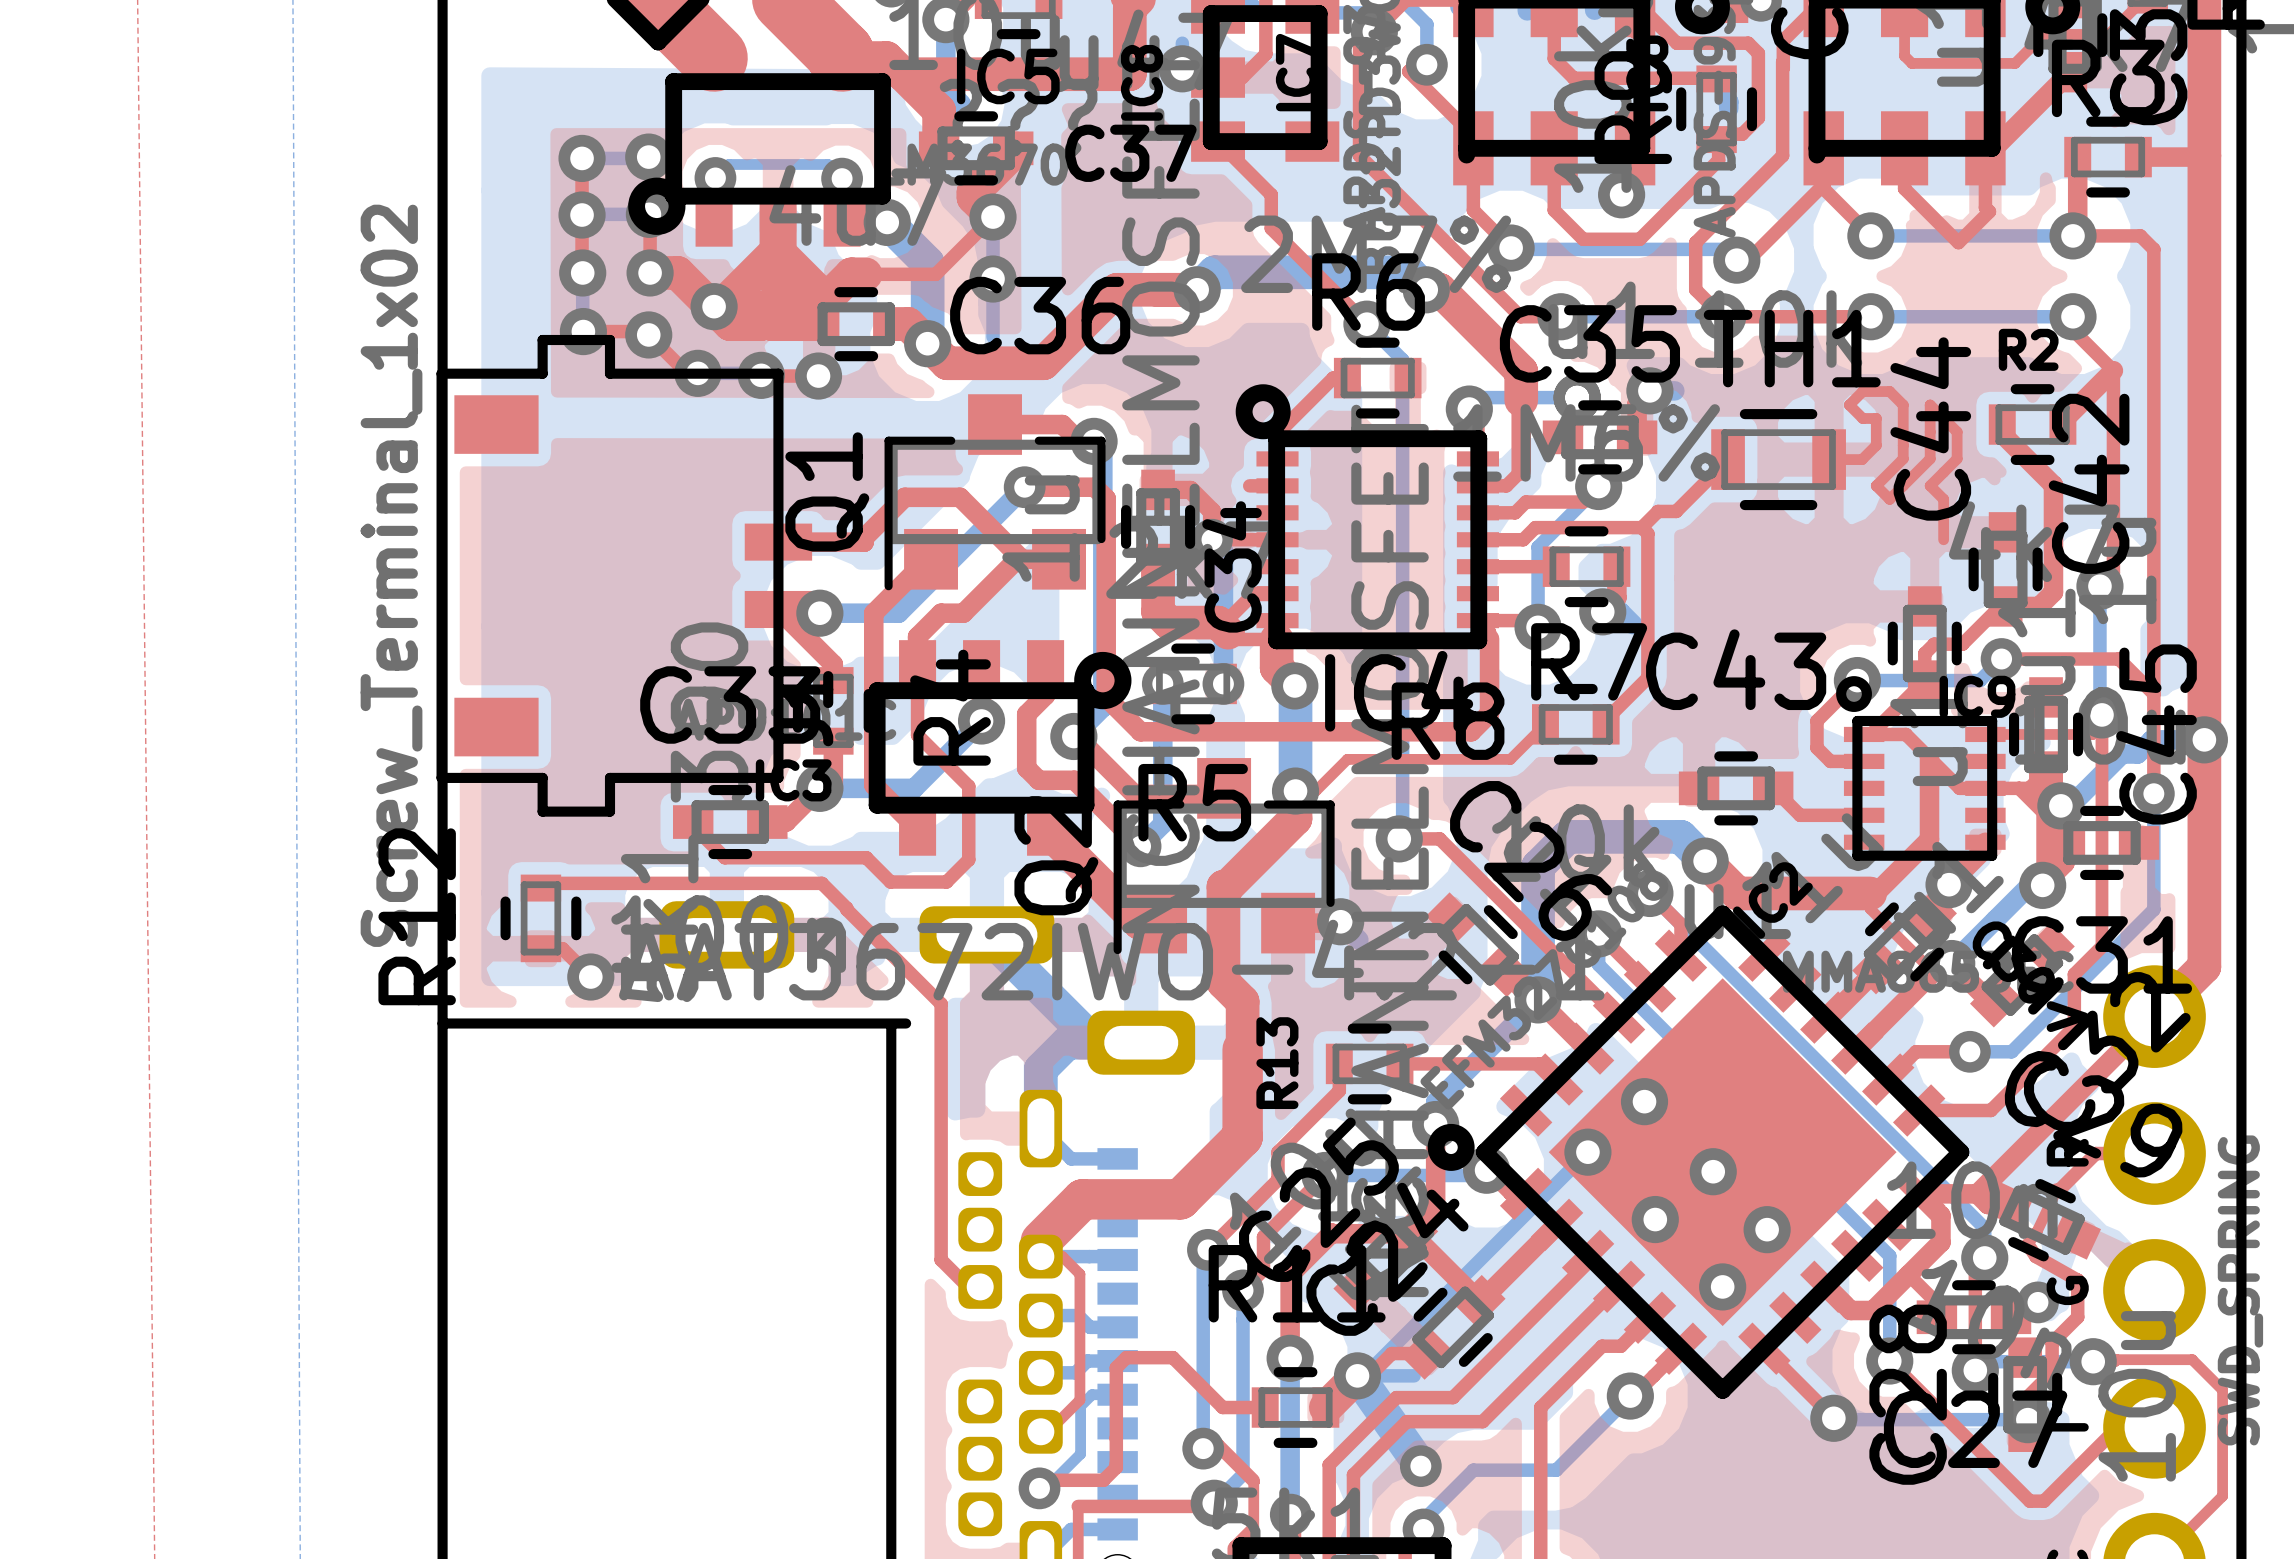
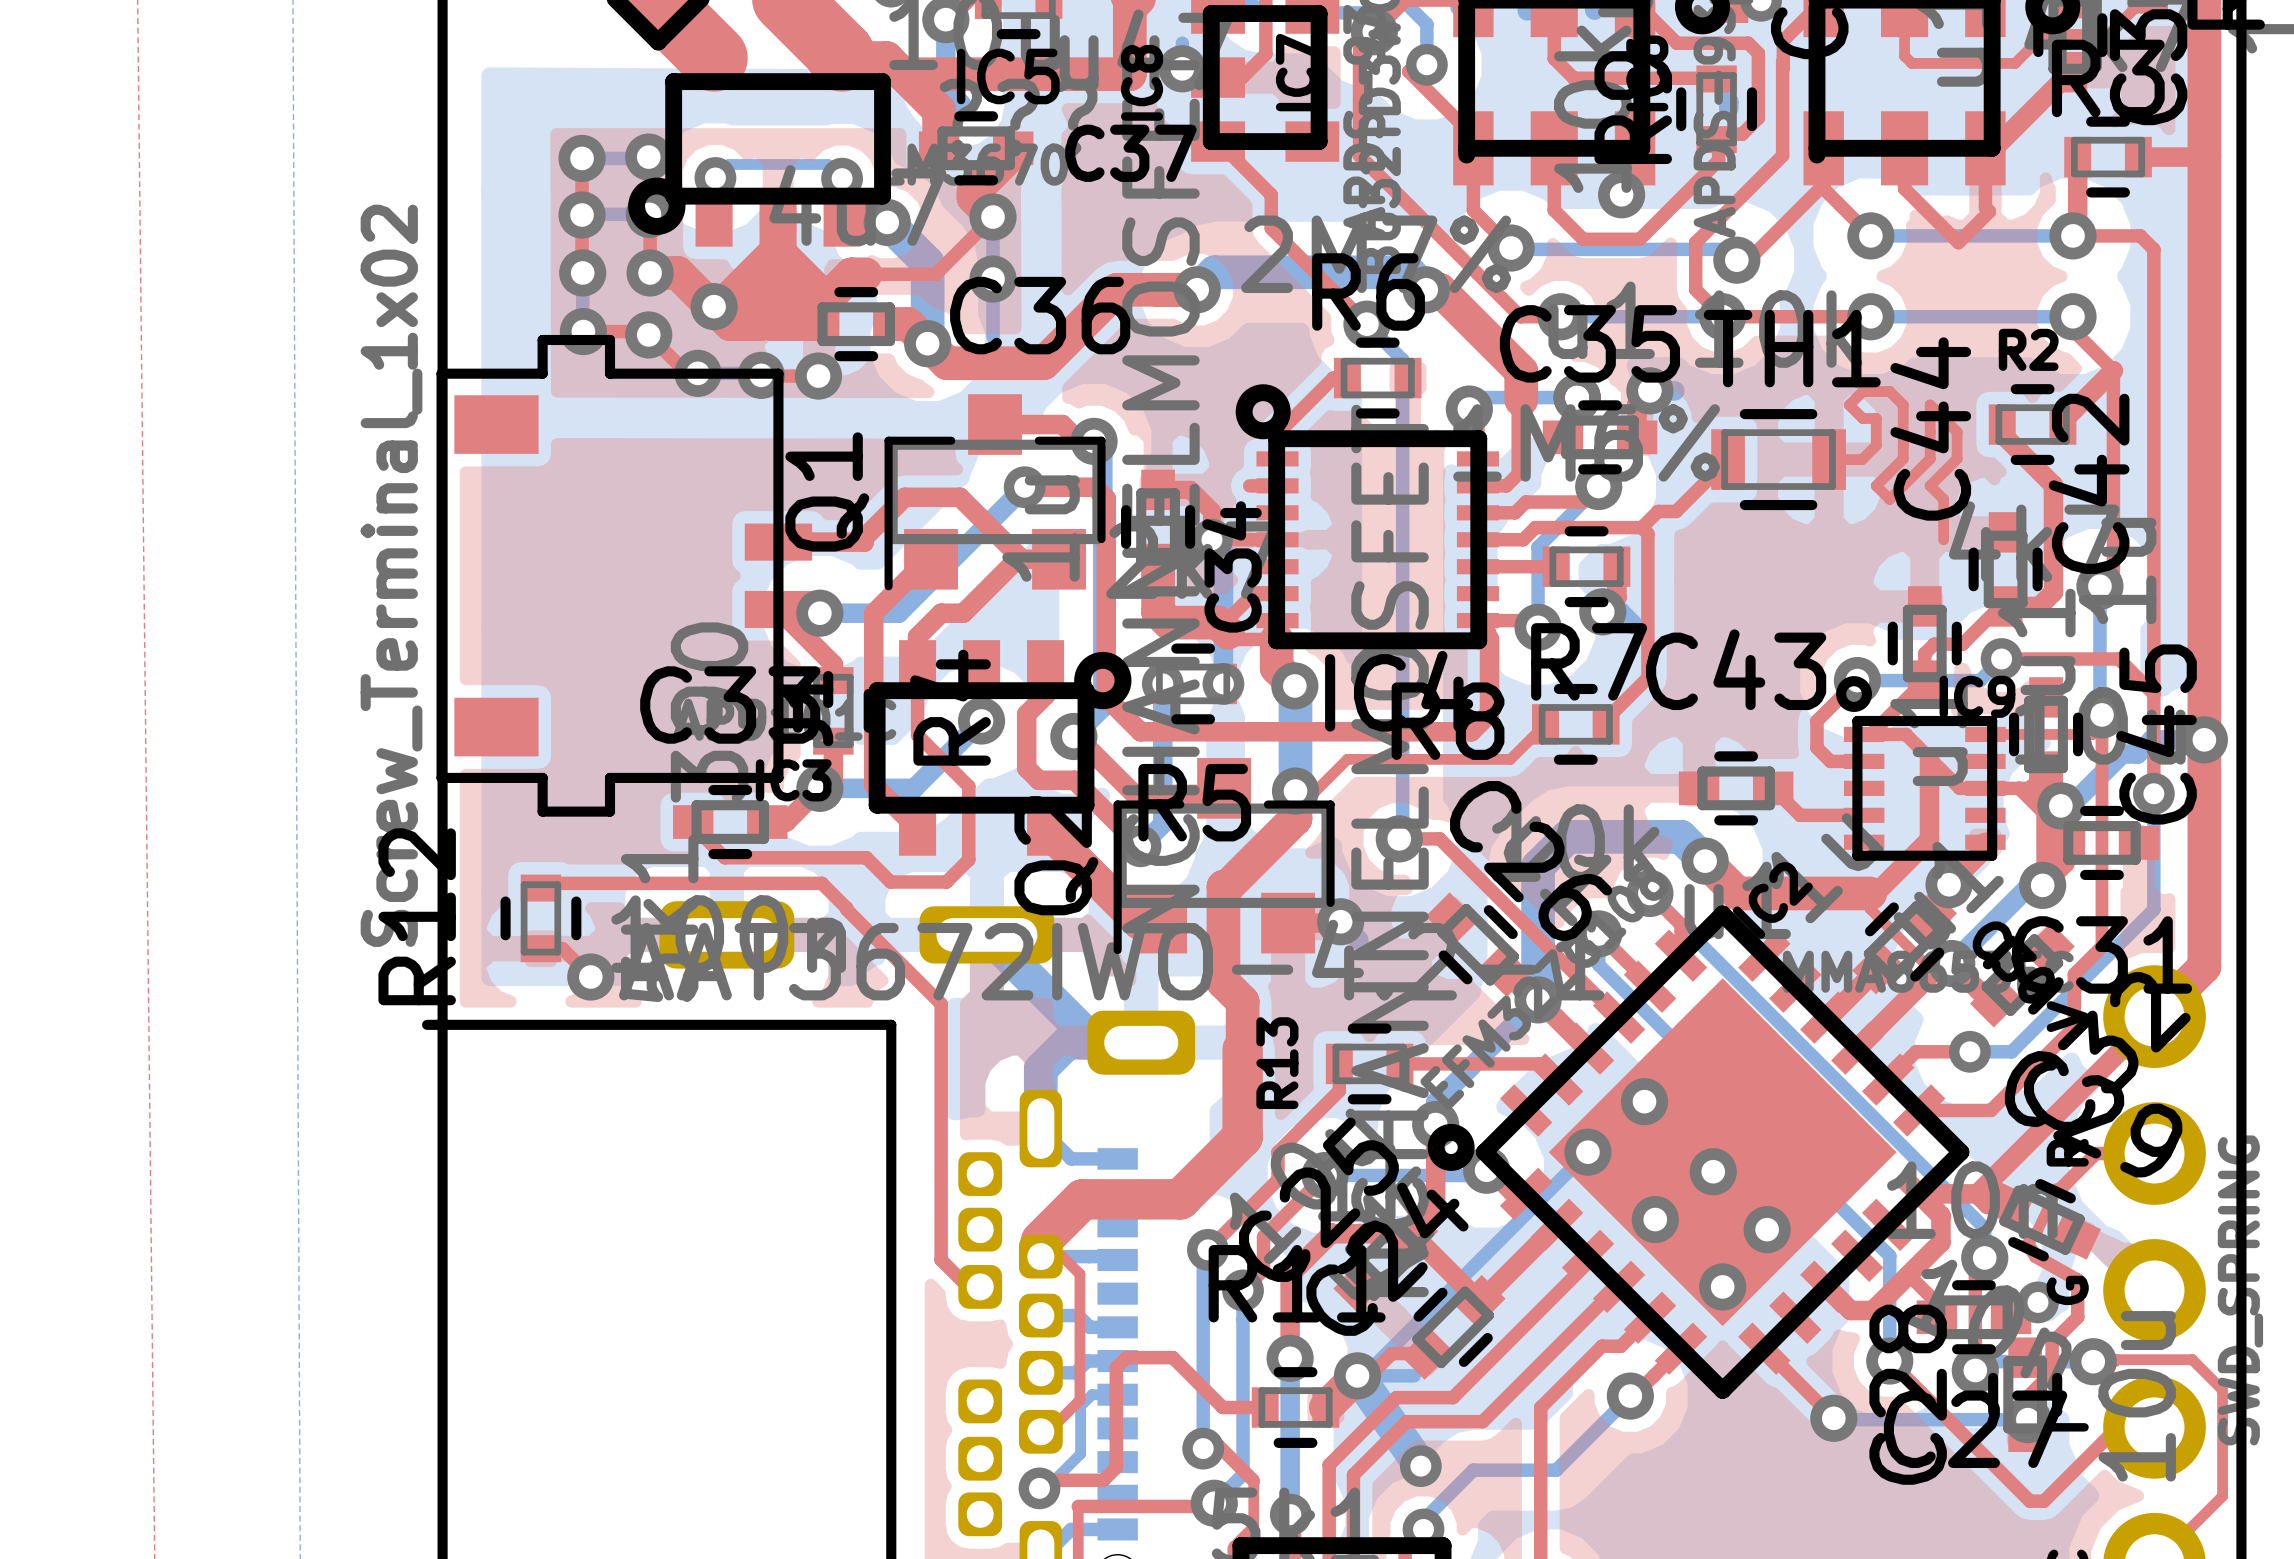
board edge: (442, 1023) (906, 1023) -> (427, 1024) (891, 1024)

